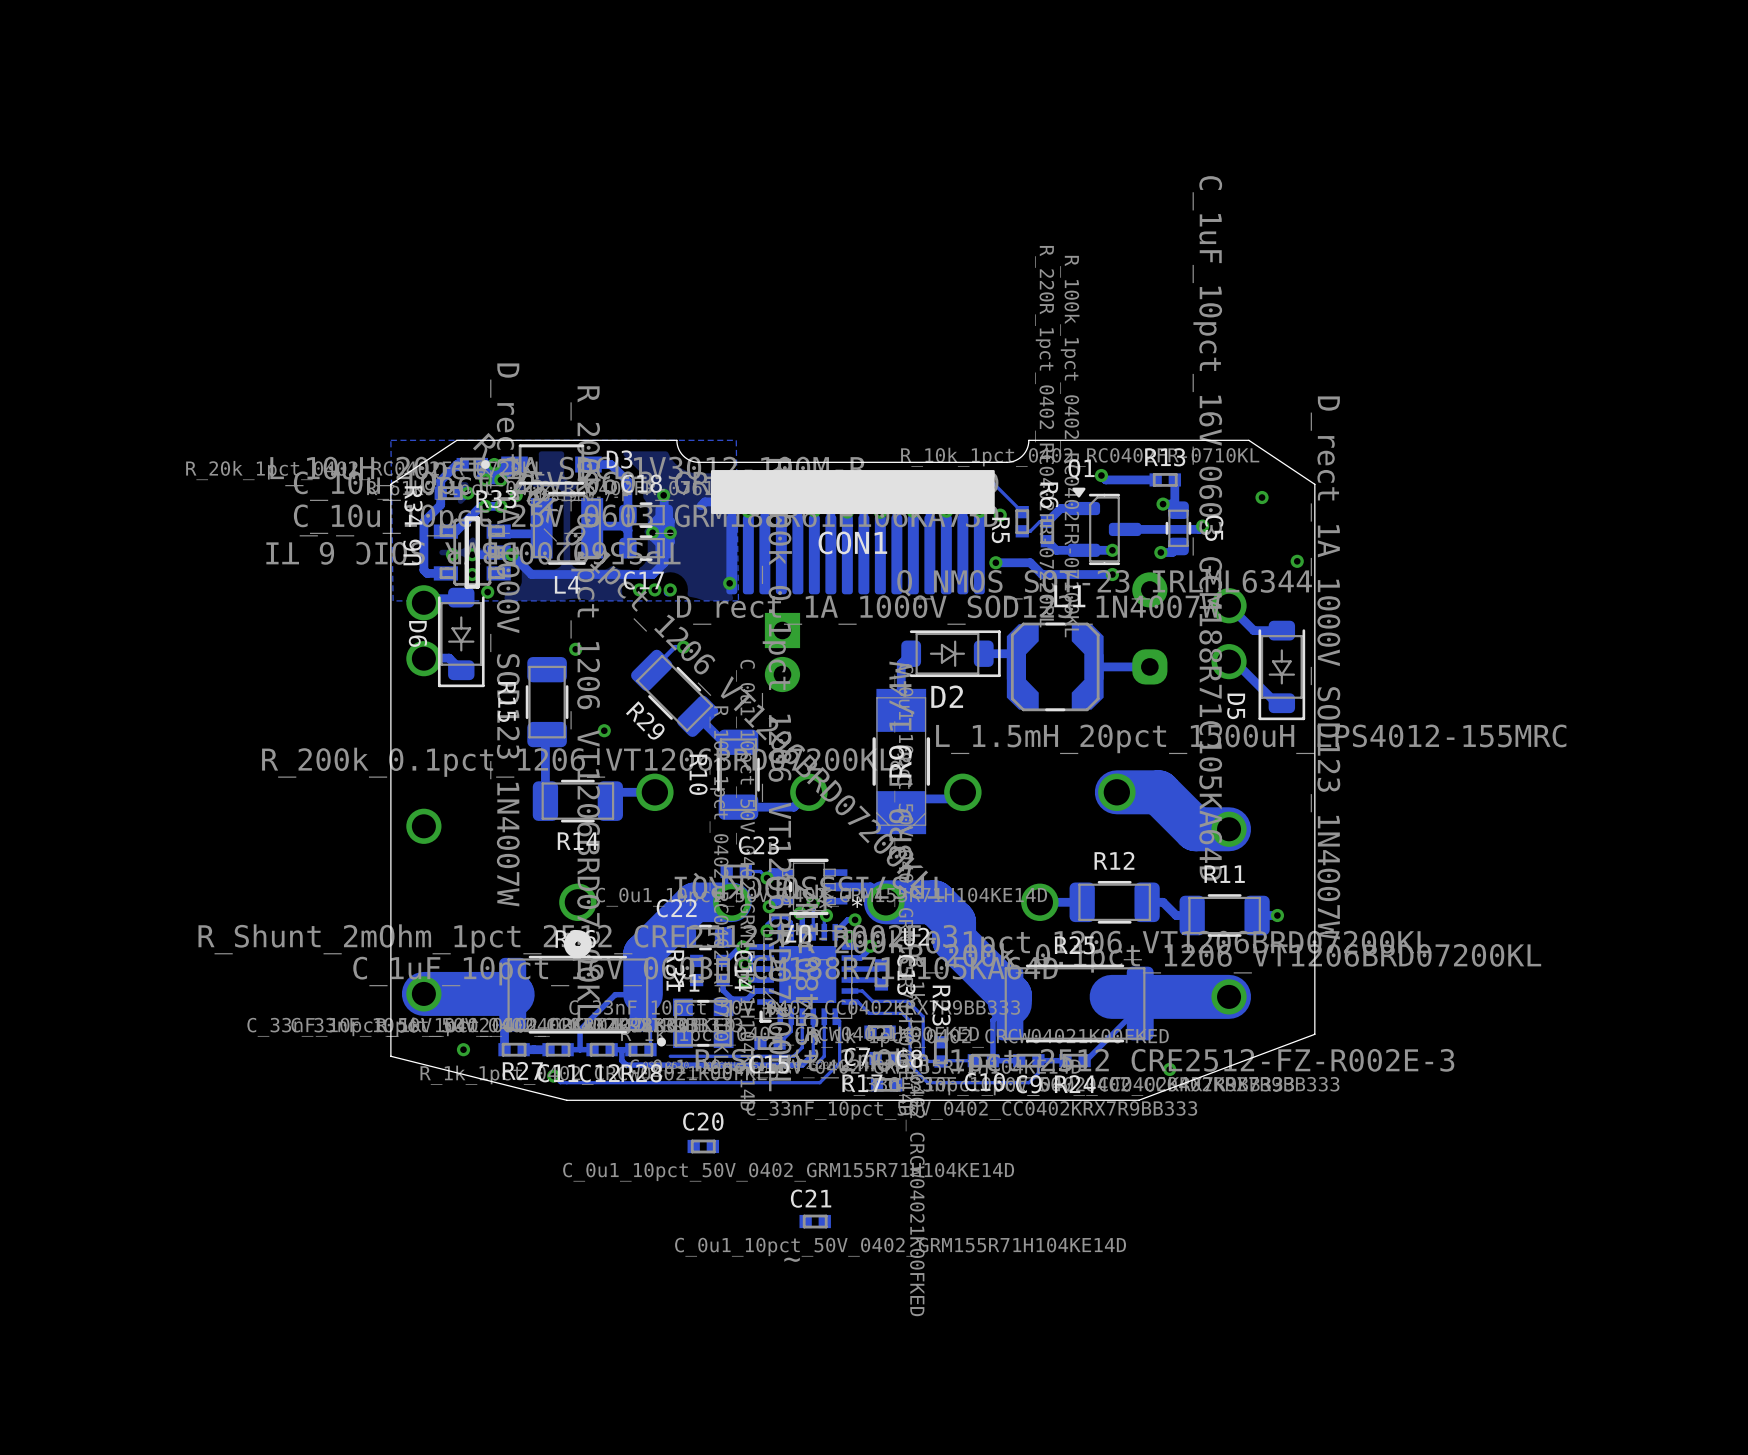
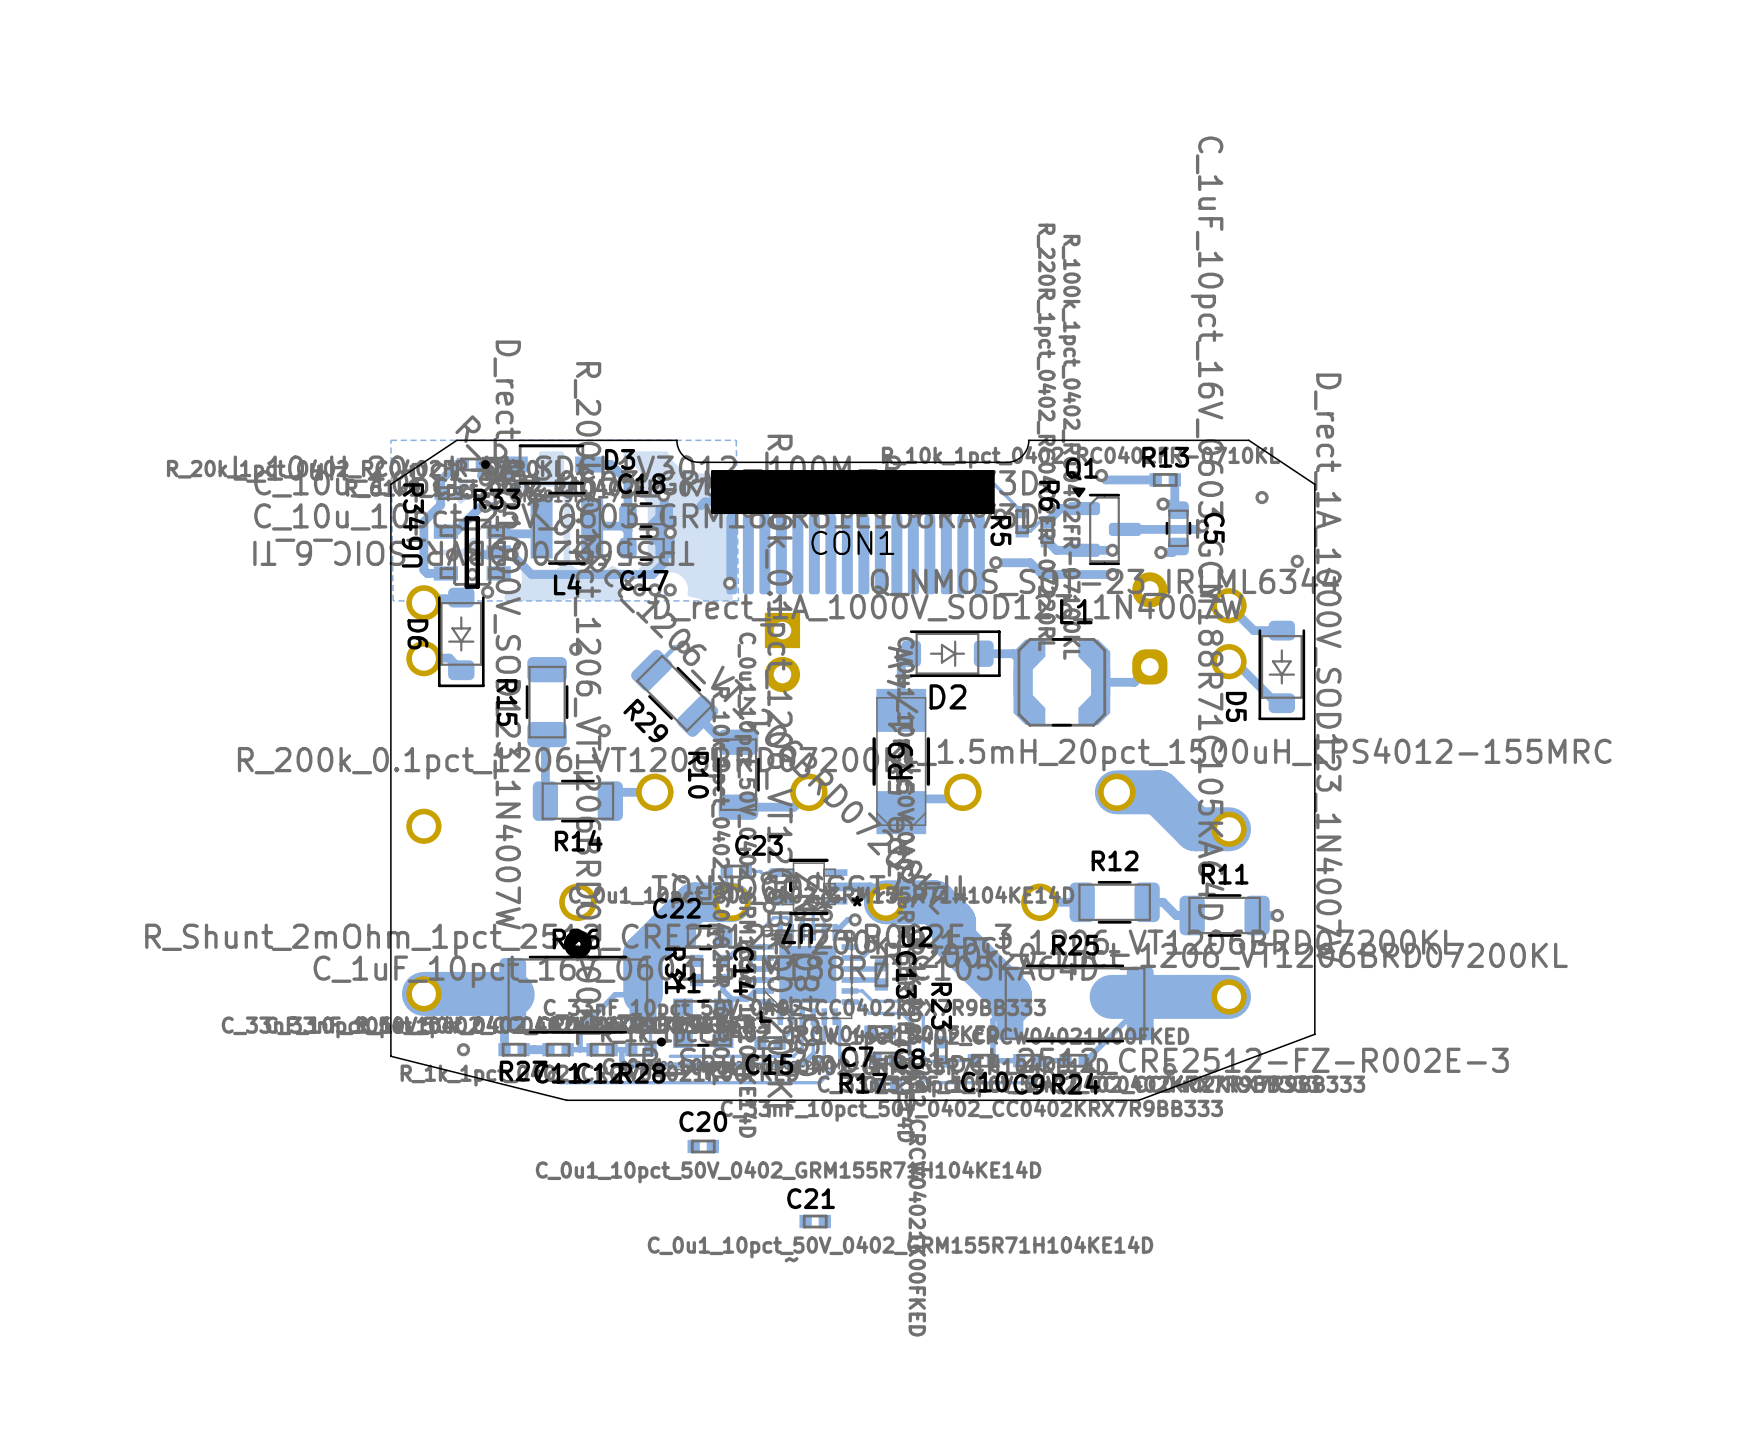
L1 position: (1055, 666) -> (1061, 682)
track: (1149, 666) (1094, 666) -> (1149, 666) (1134, 682) (1100, 682)

